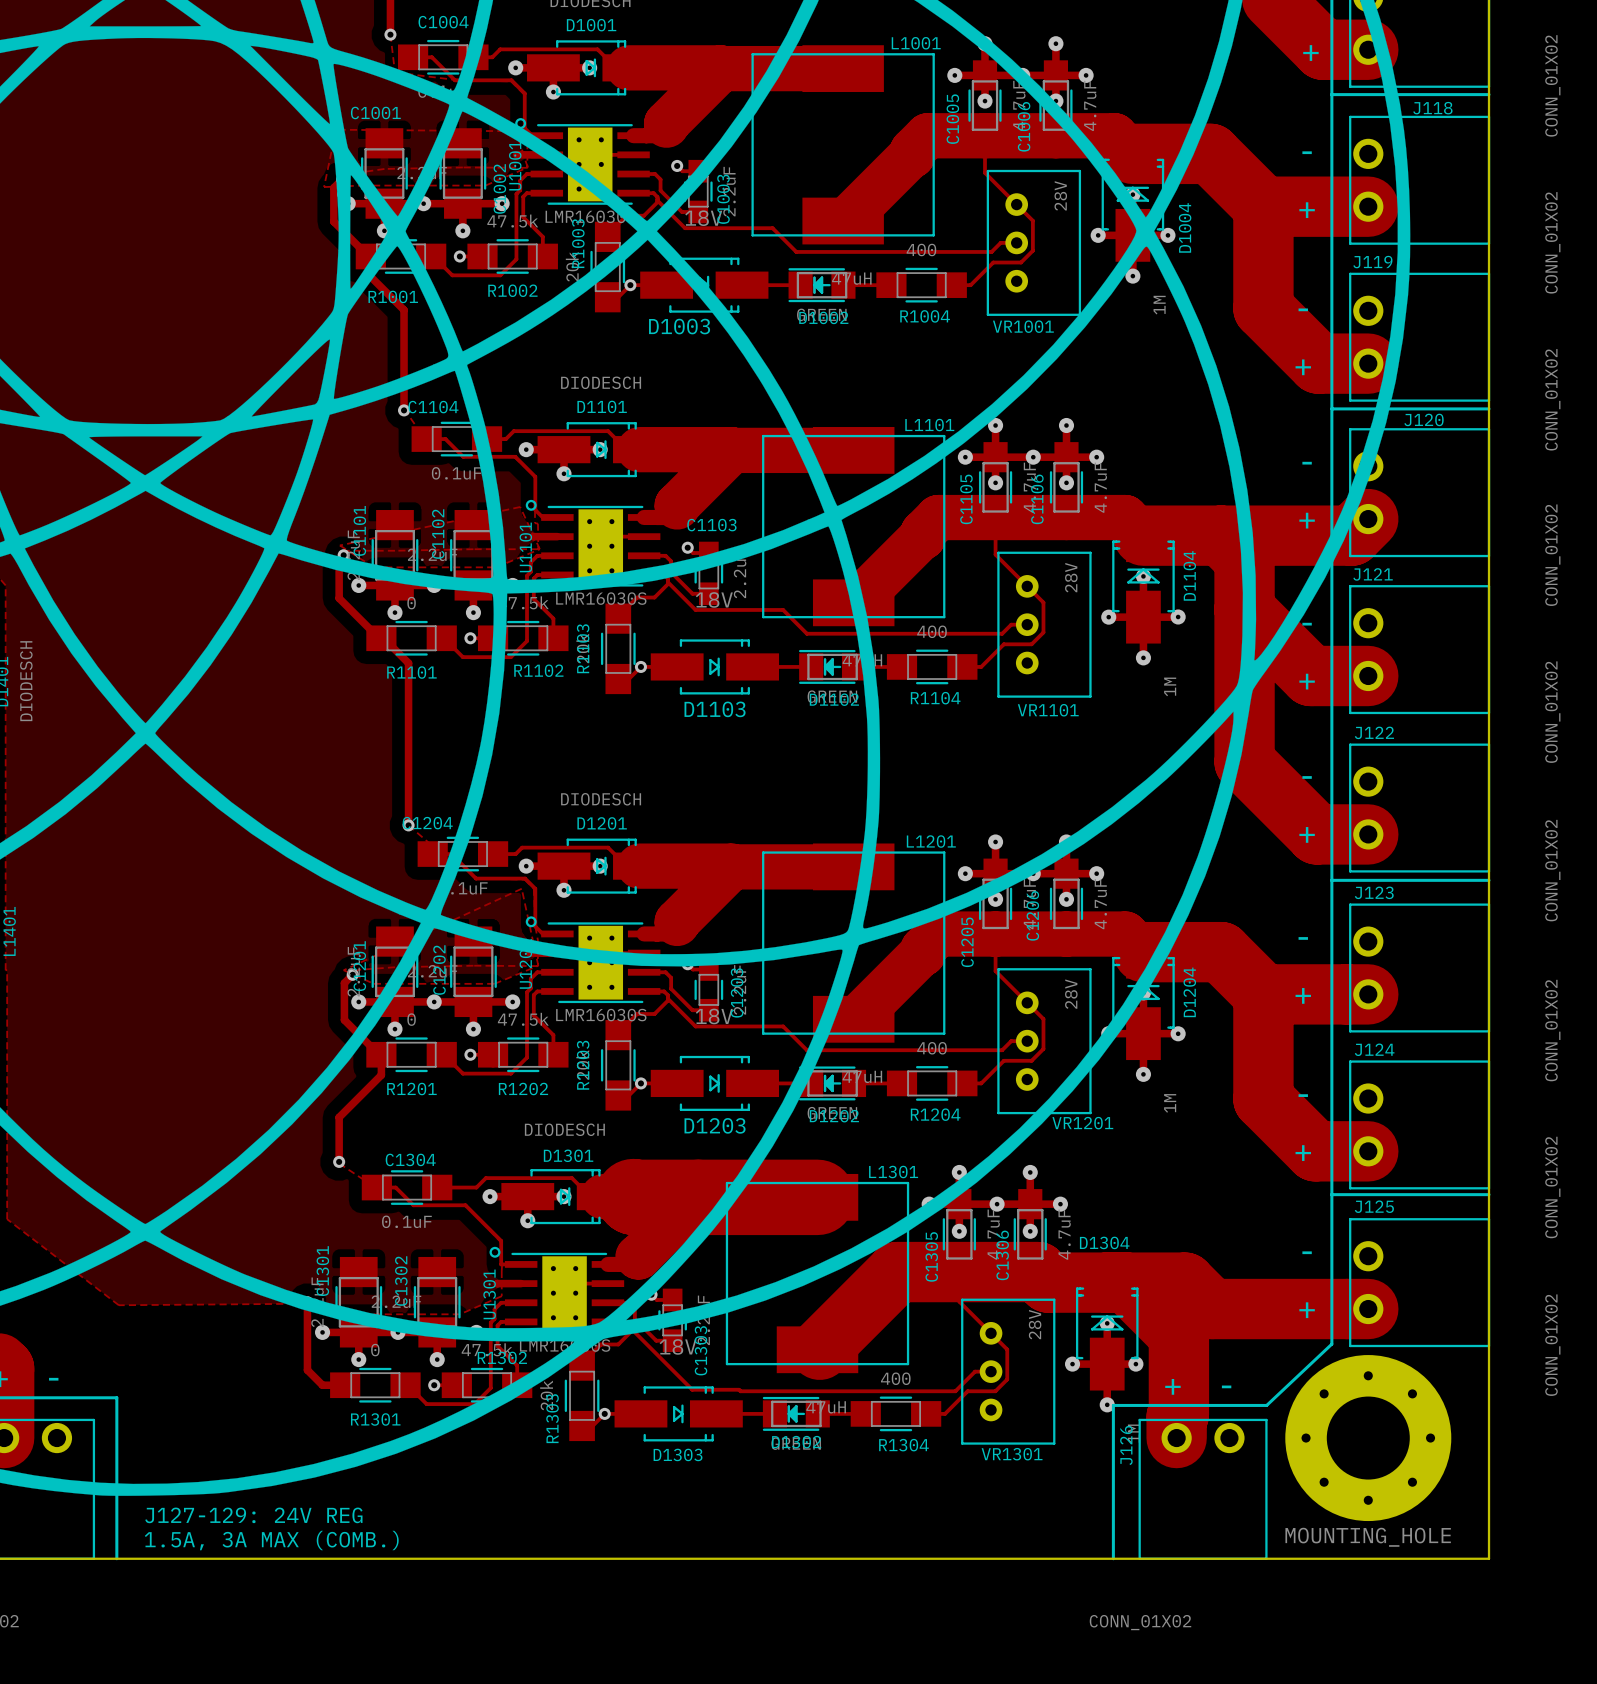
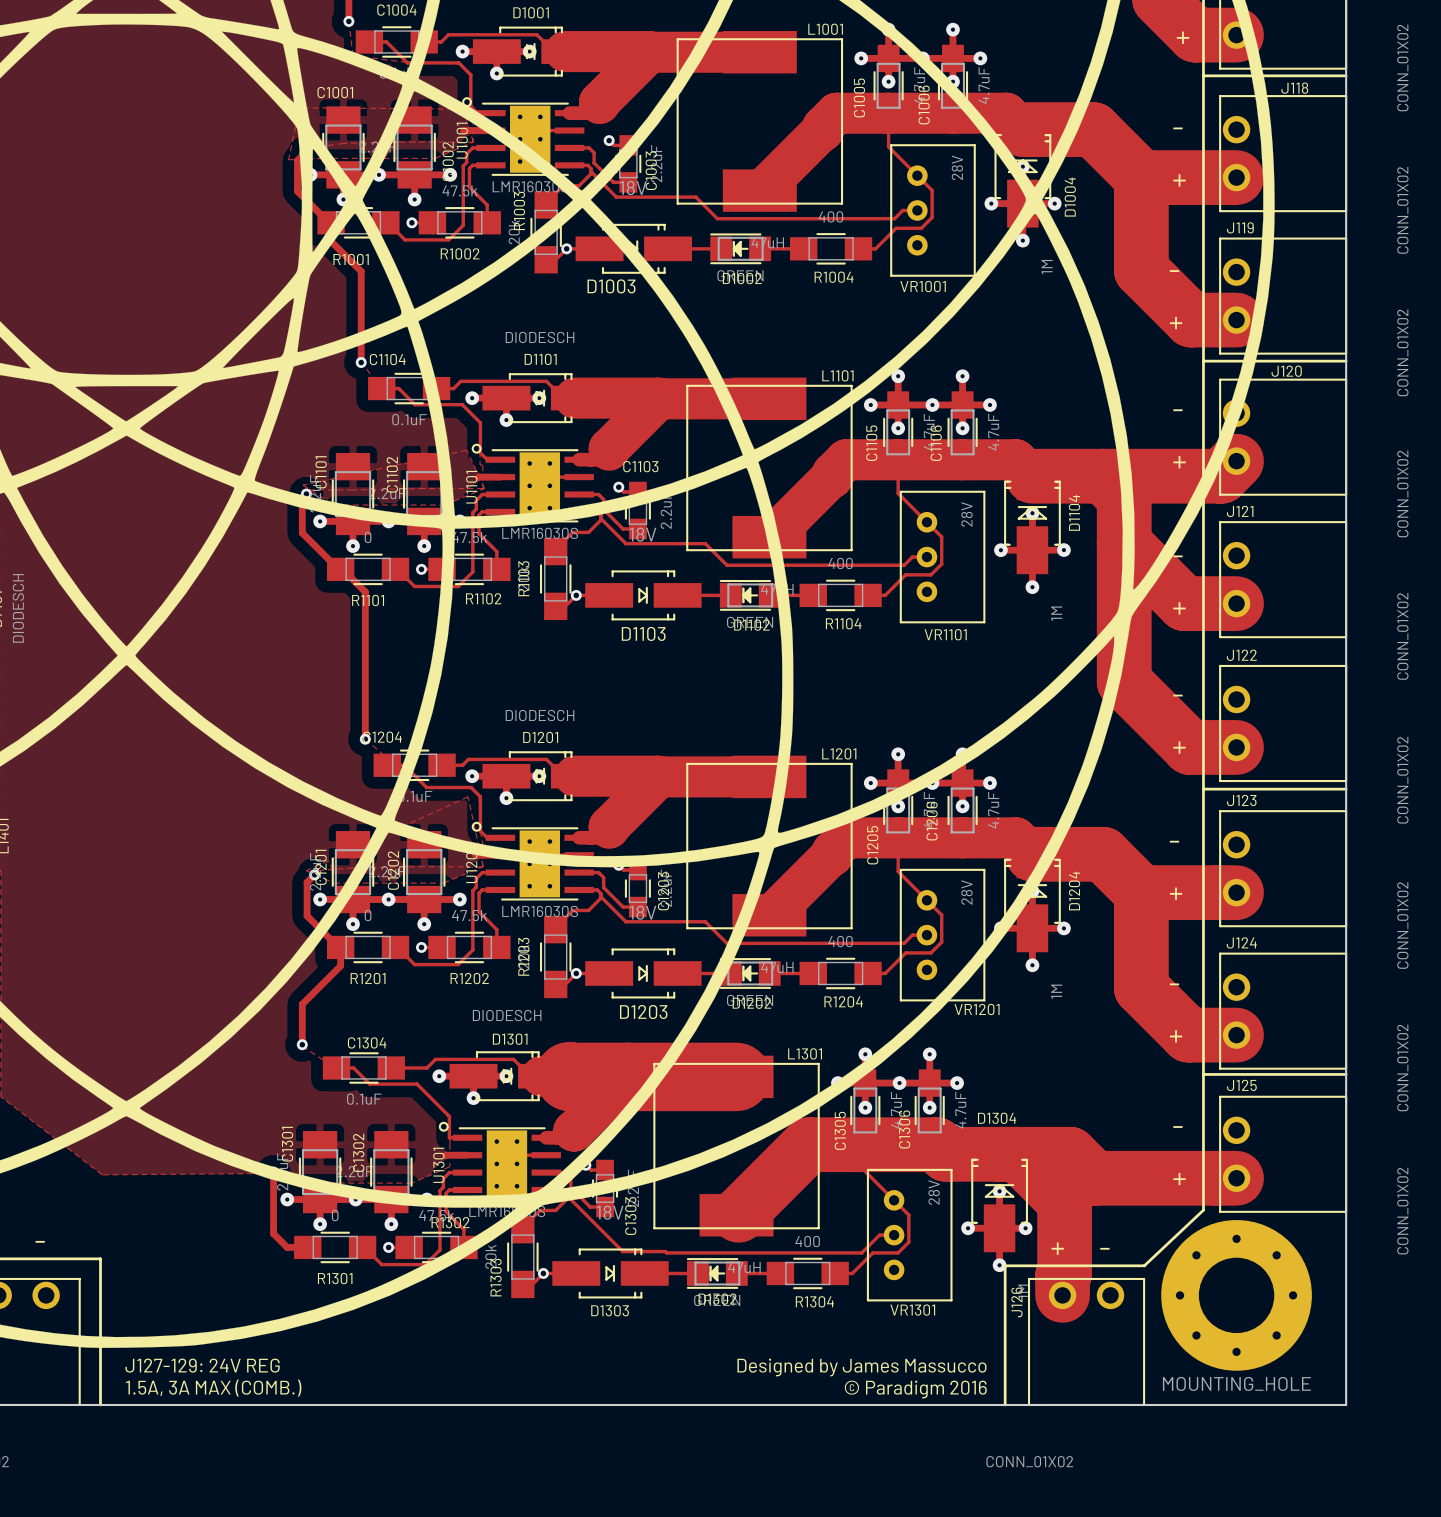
text: none -> Designed by James Massucco (861, 1367)
text: none -> © Paradigm 2016 (915, 1389)

